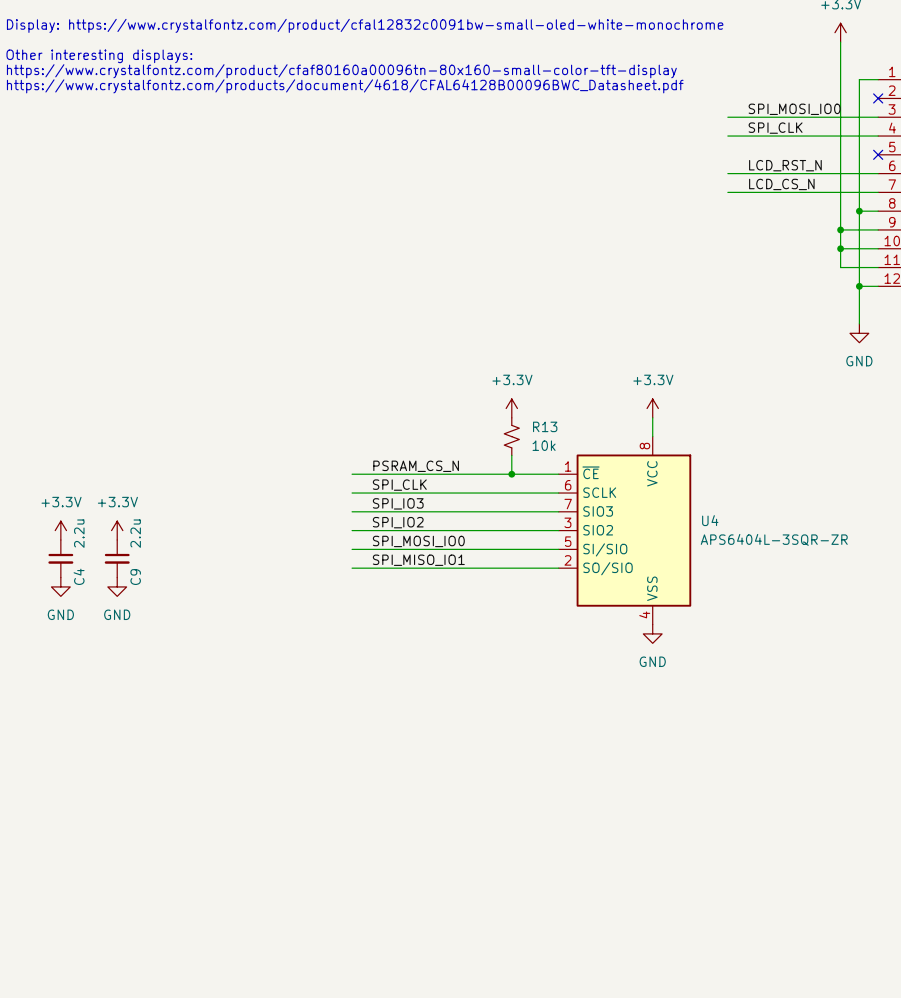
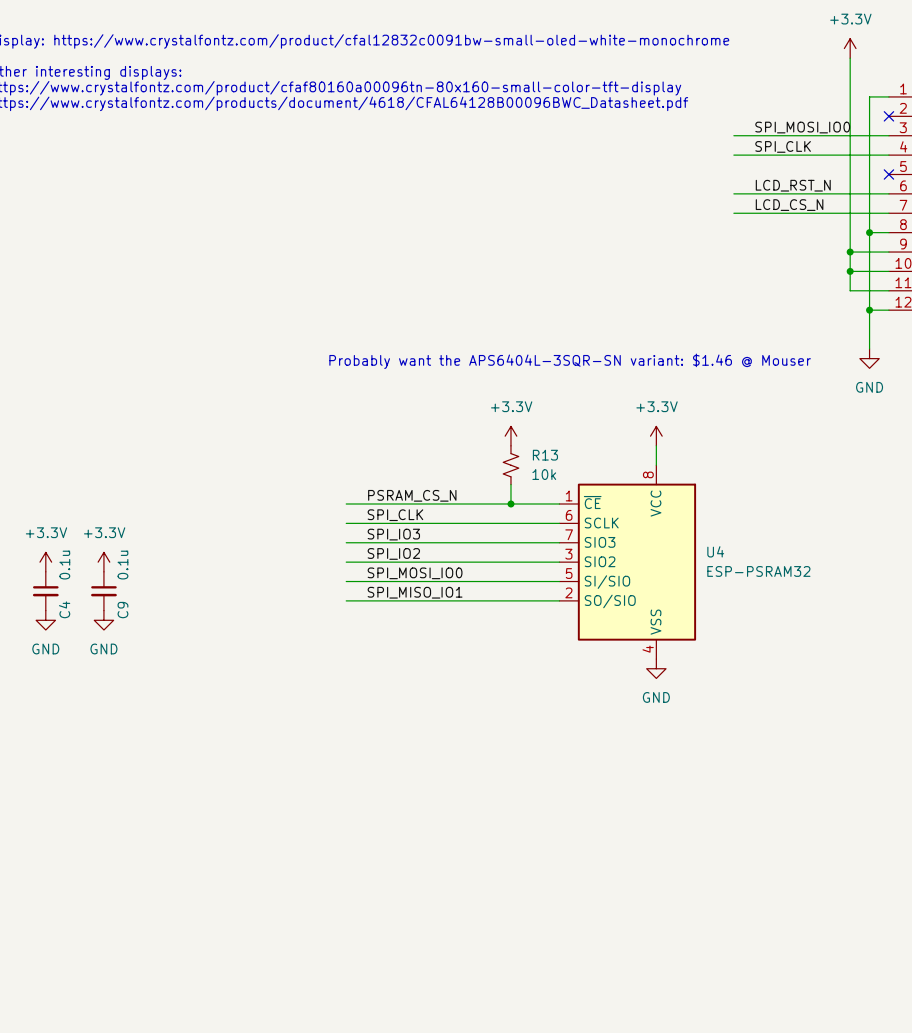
text: none -> Probably want the APS6404L-3SQR-SN variant: $1.46 @ Mouser (570, 361)
C4 value: 2.2u (79, 533) -> 0.1u (64, 565)
C9 value: 2.2u (135, 533) -> 0.1u (122, 565)
U4 value: APS6404L-3SQR-ZR (774, 539) -> ESP-PSRAM32 (758, 571)

